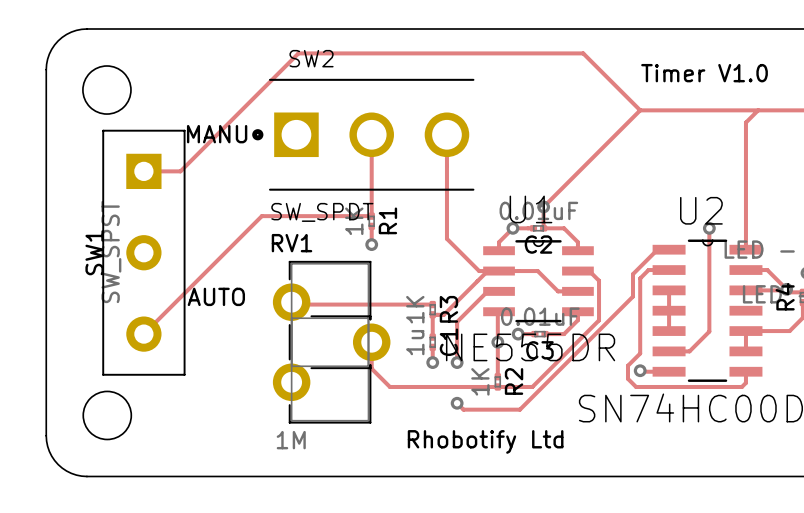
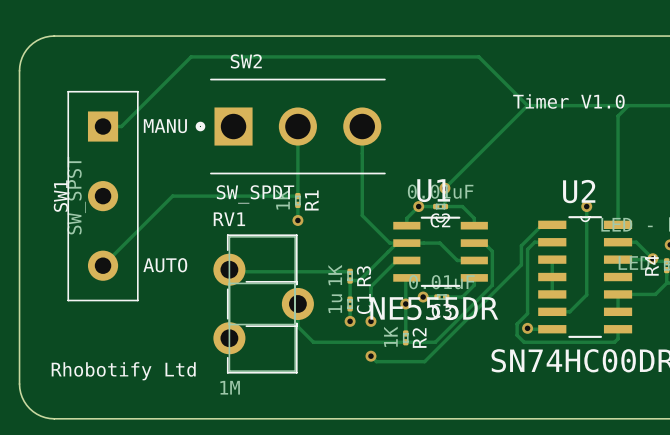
track: (298, 53) (180, 171) (143, 171) -> (235, 56) (191, 56) (121, 126) (103, 126)
round board edge: [82, 65, 132, 115] -> none
text position: Timer V1.0 (704, 73) -> Timer V1.0 (568, 101)
track: (261, 216) (143, 334) -> (203, 196) (172, 196) (103, 265)
SW1 position: (143, 252) -> (103, 196)
round board edge: [82, 391, 132, 440] -> none
text position: Rhobotify Ltd (485, 441) -> Rhobotify Ltd (123, 371)

